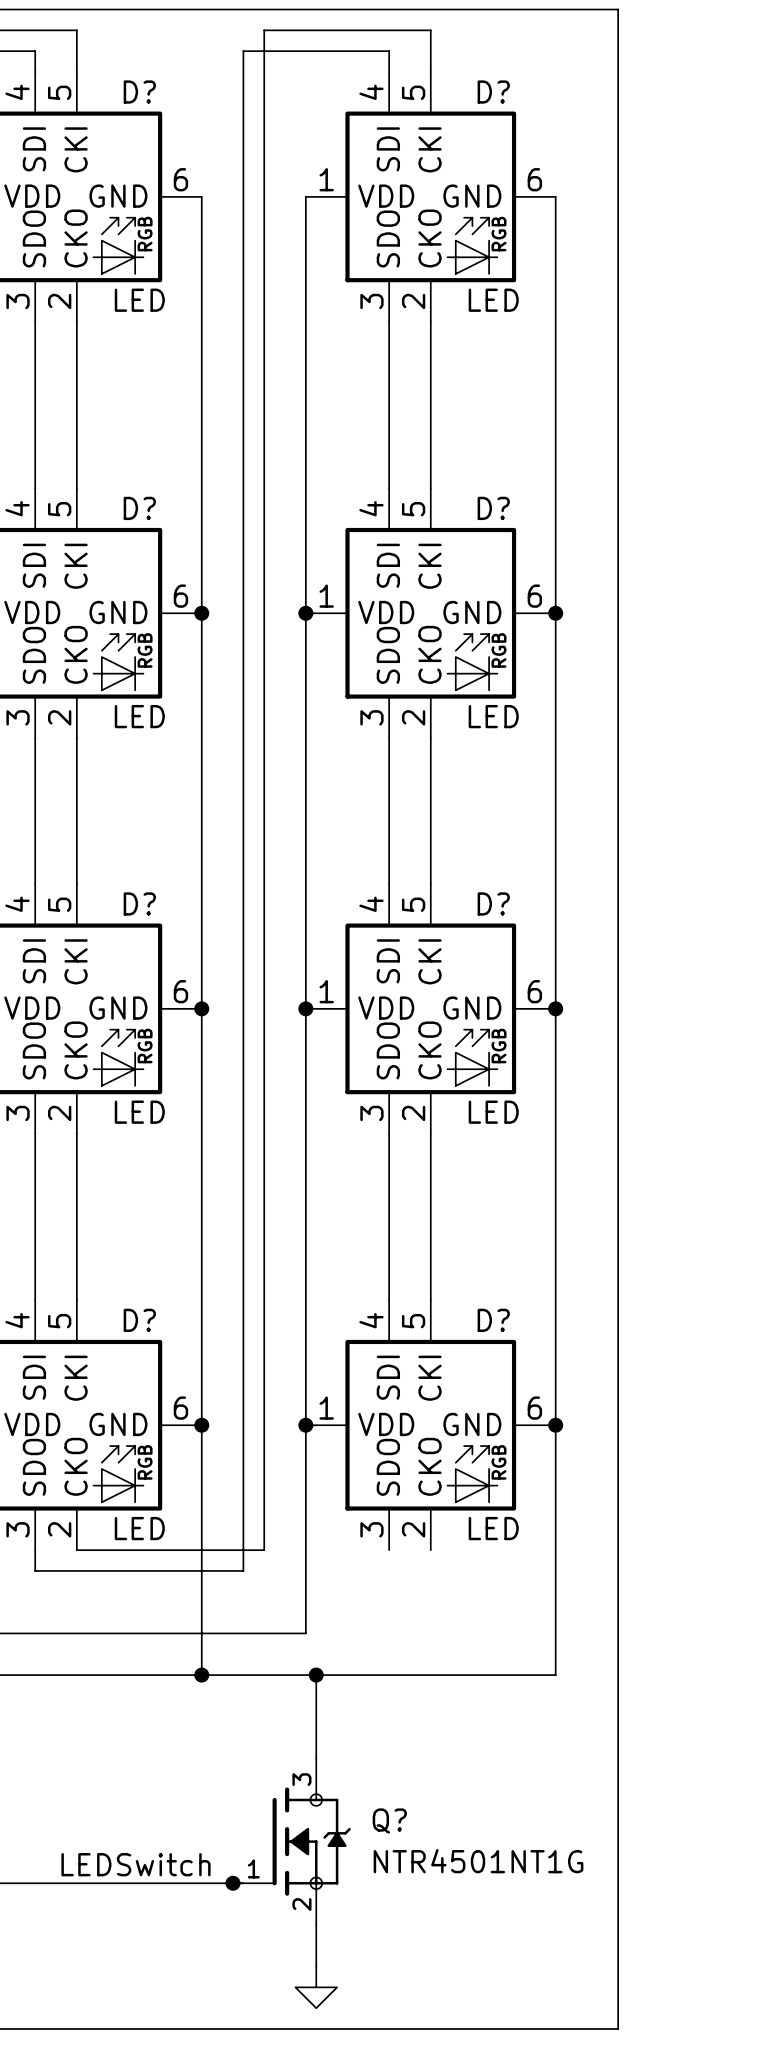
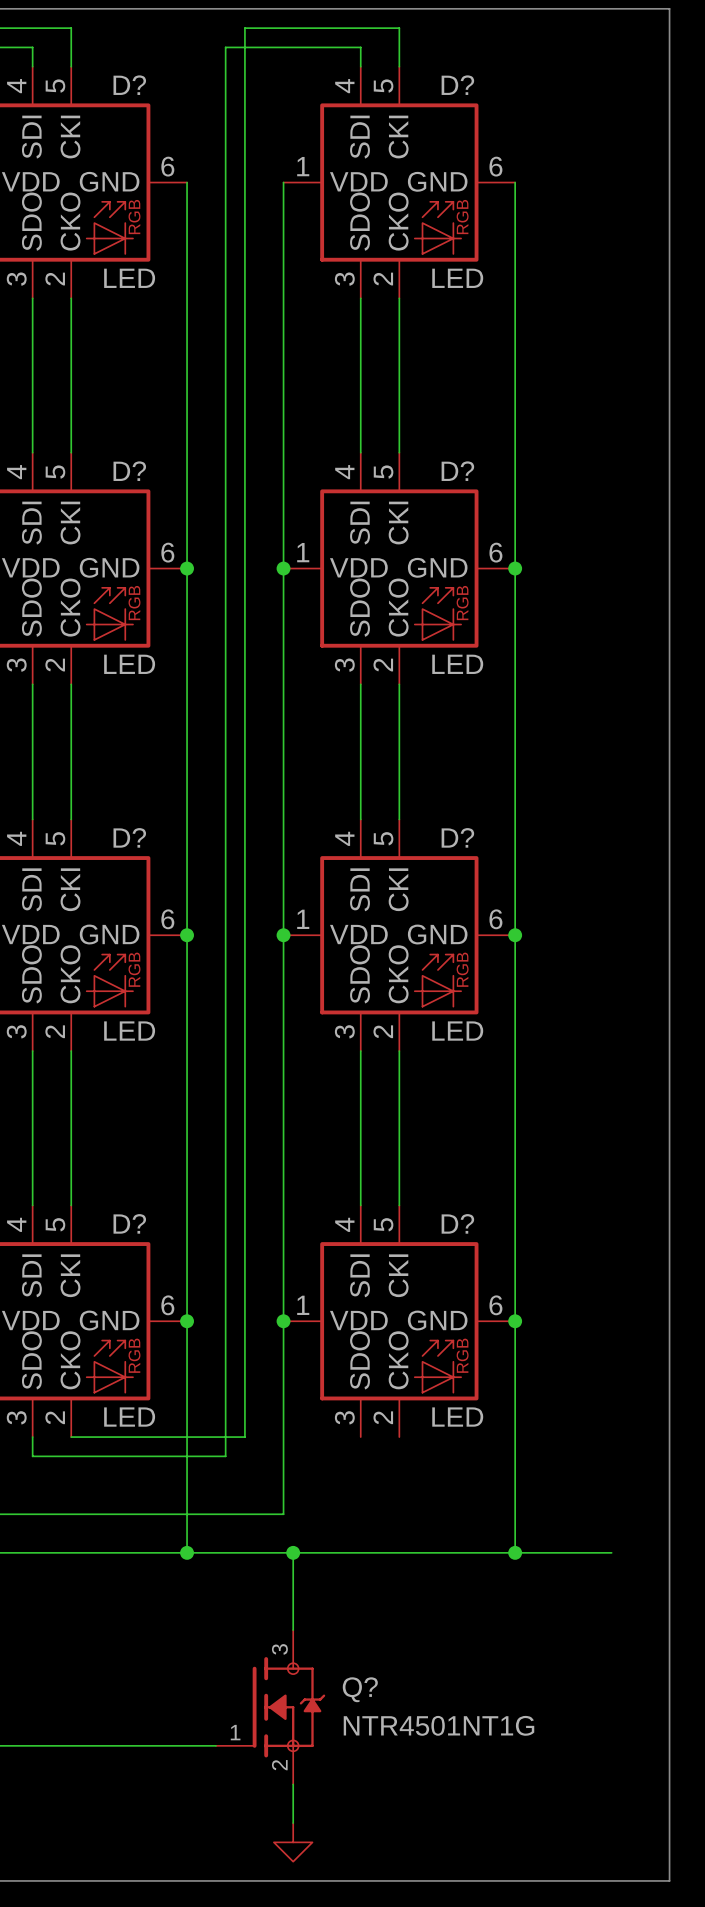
line: (618, 9) (618, 2029) -> (573, 8) (669, 8) (669, 1880) (573, 1880)
wire: none -> (515, 1552) (611, 1552)
junction: none -> (515, 1552)
label: LEDSwitch (135, 1864) -> none
junction: (232, 1883) -> none

